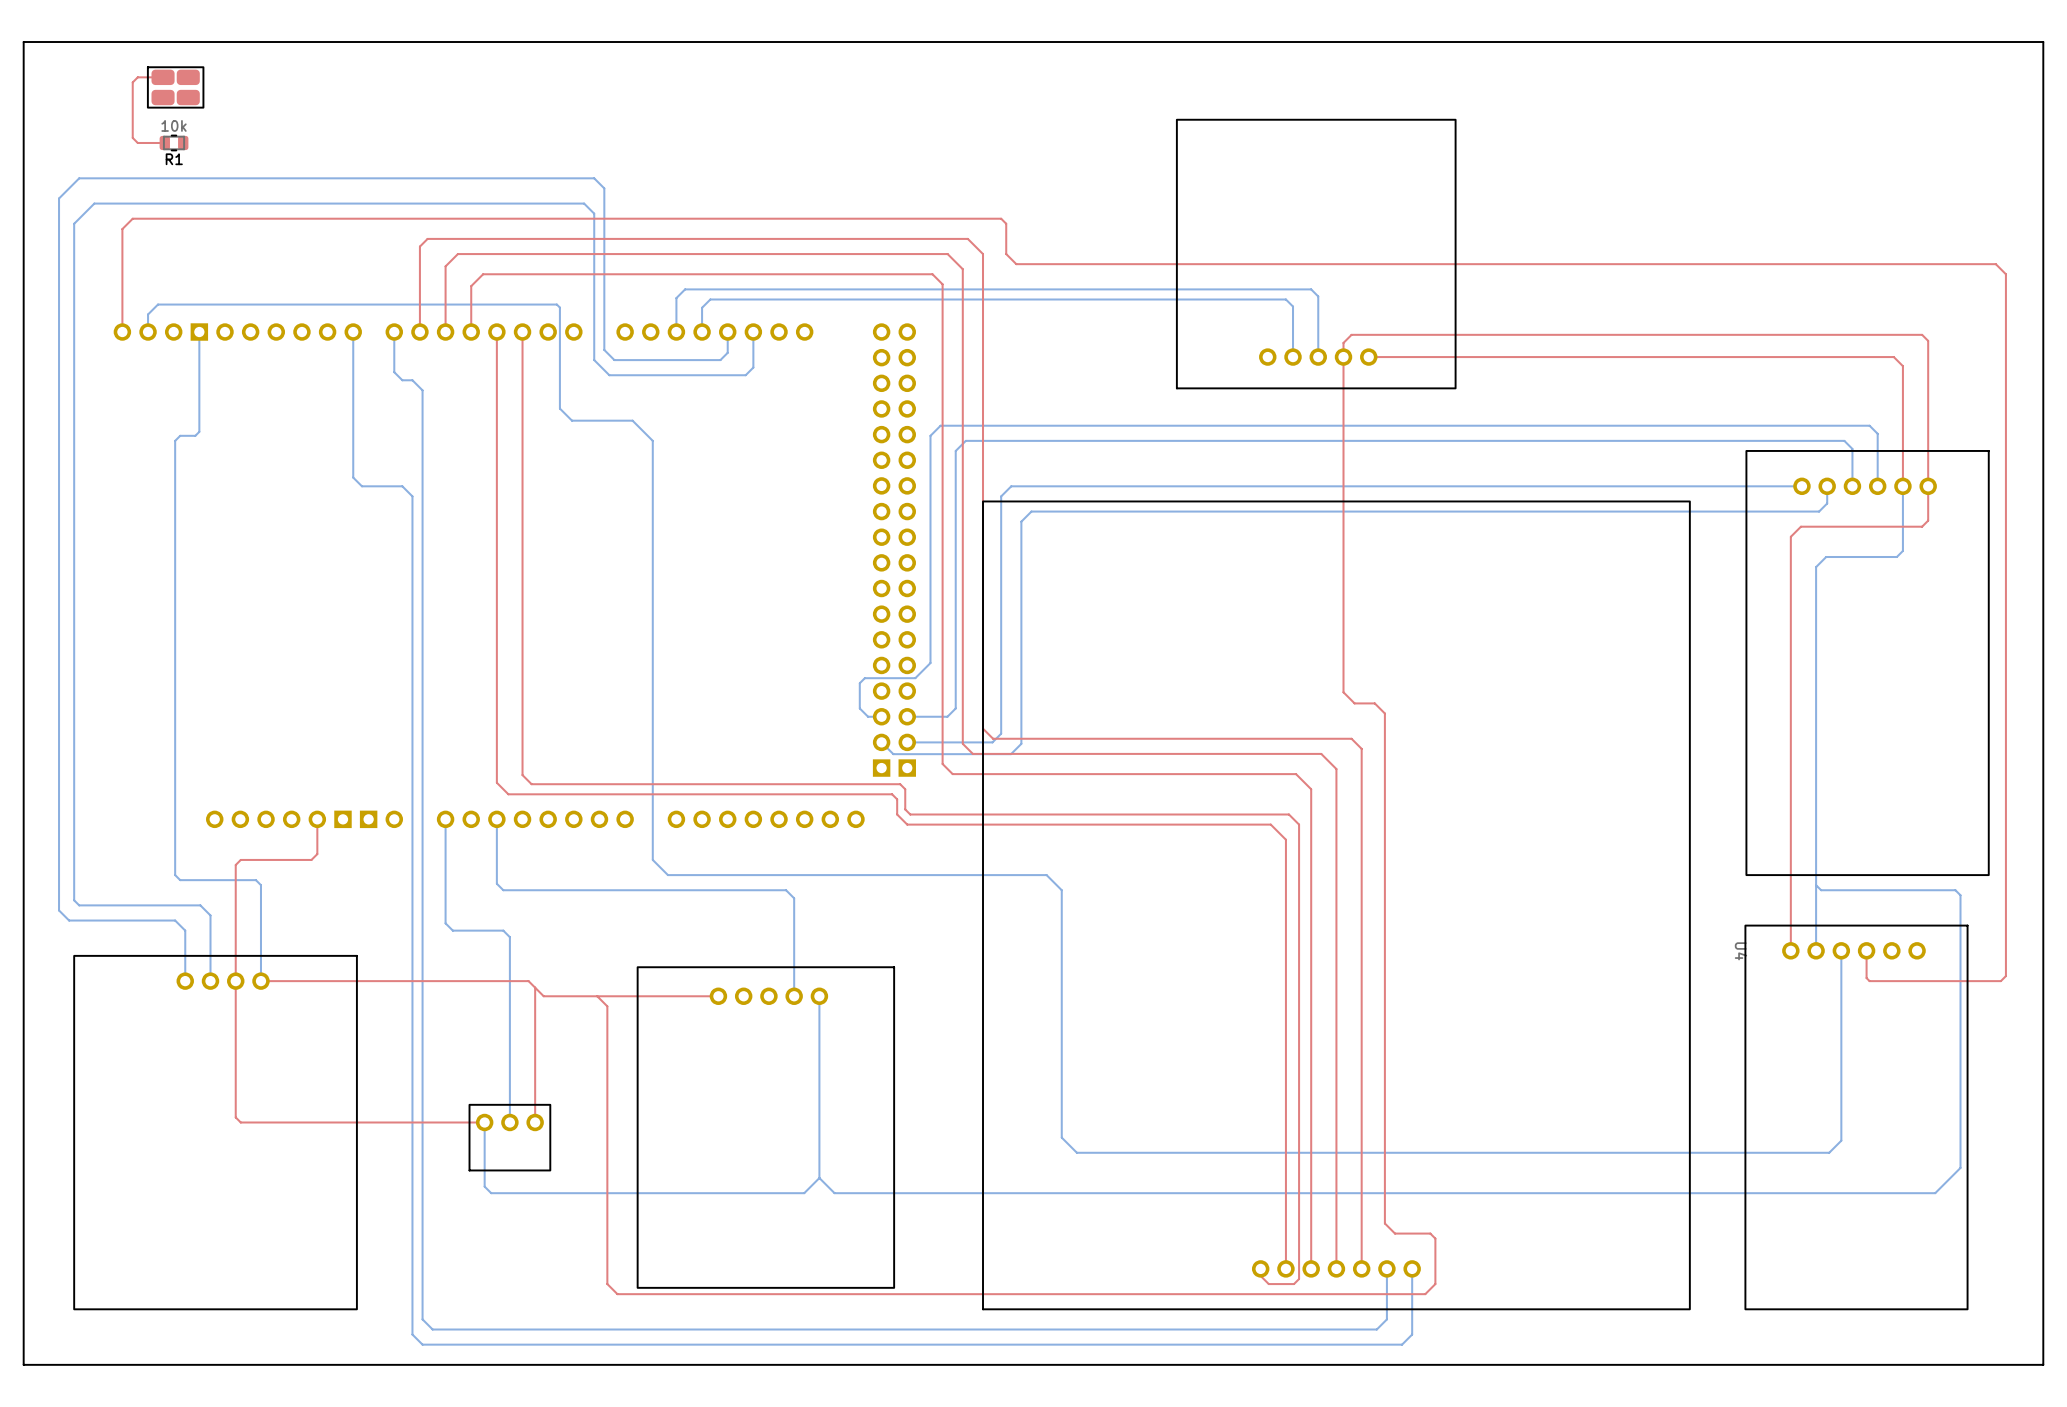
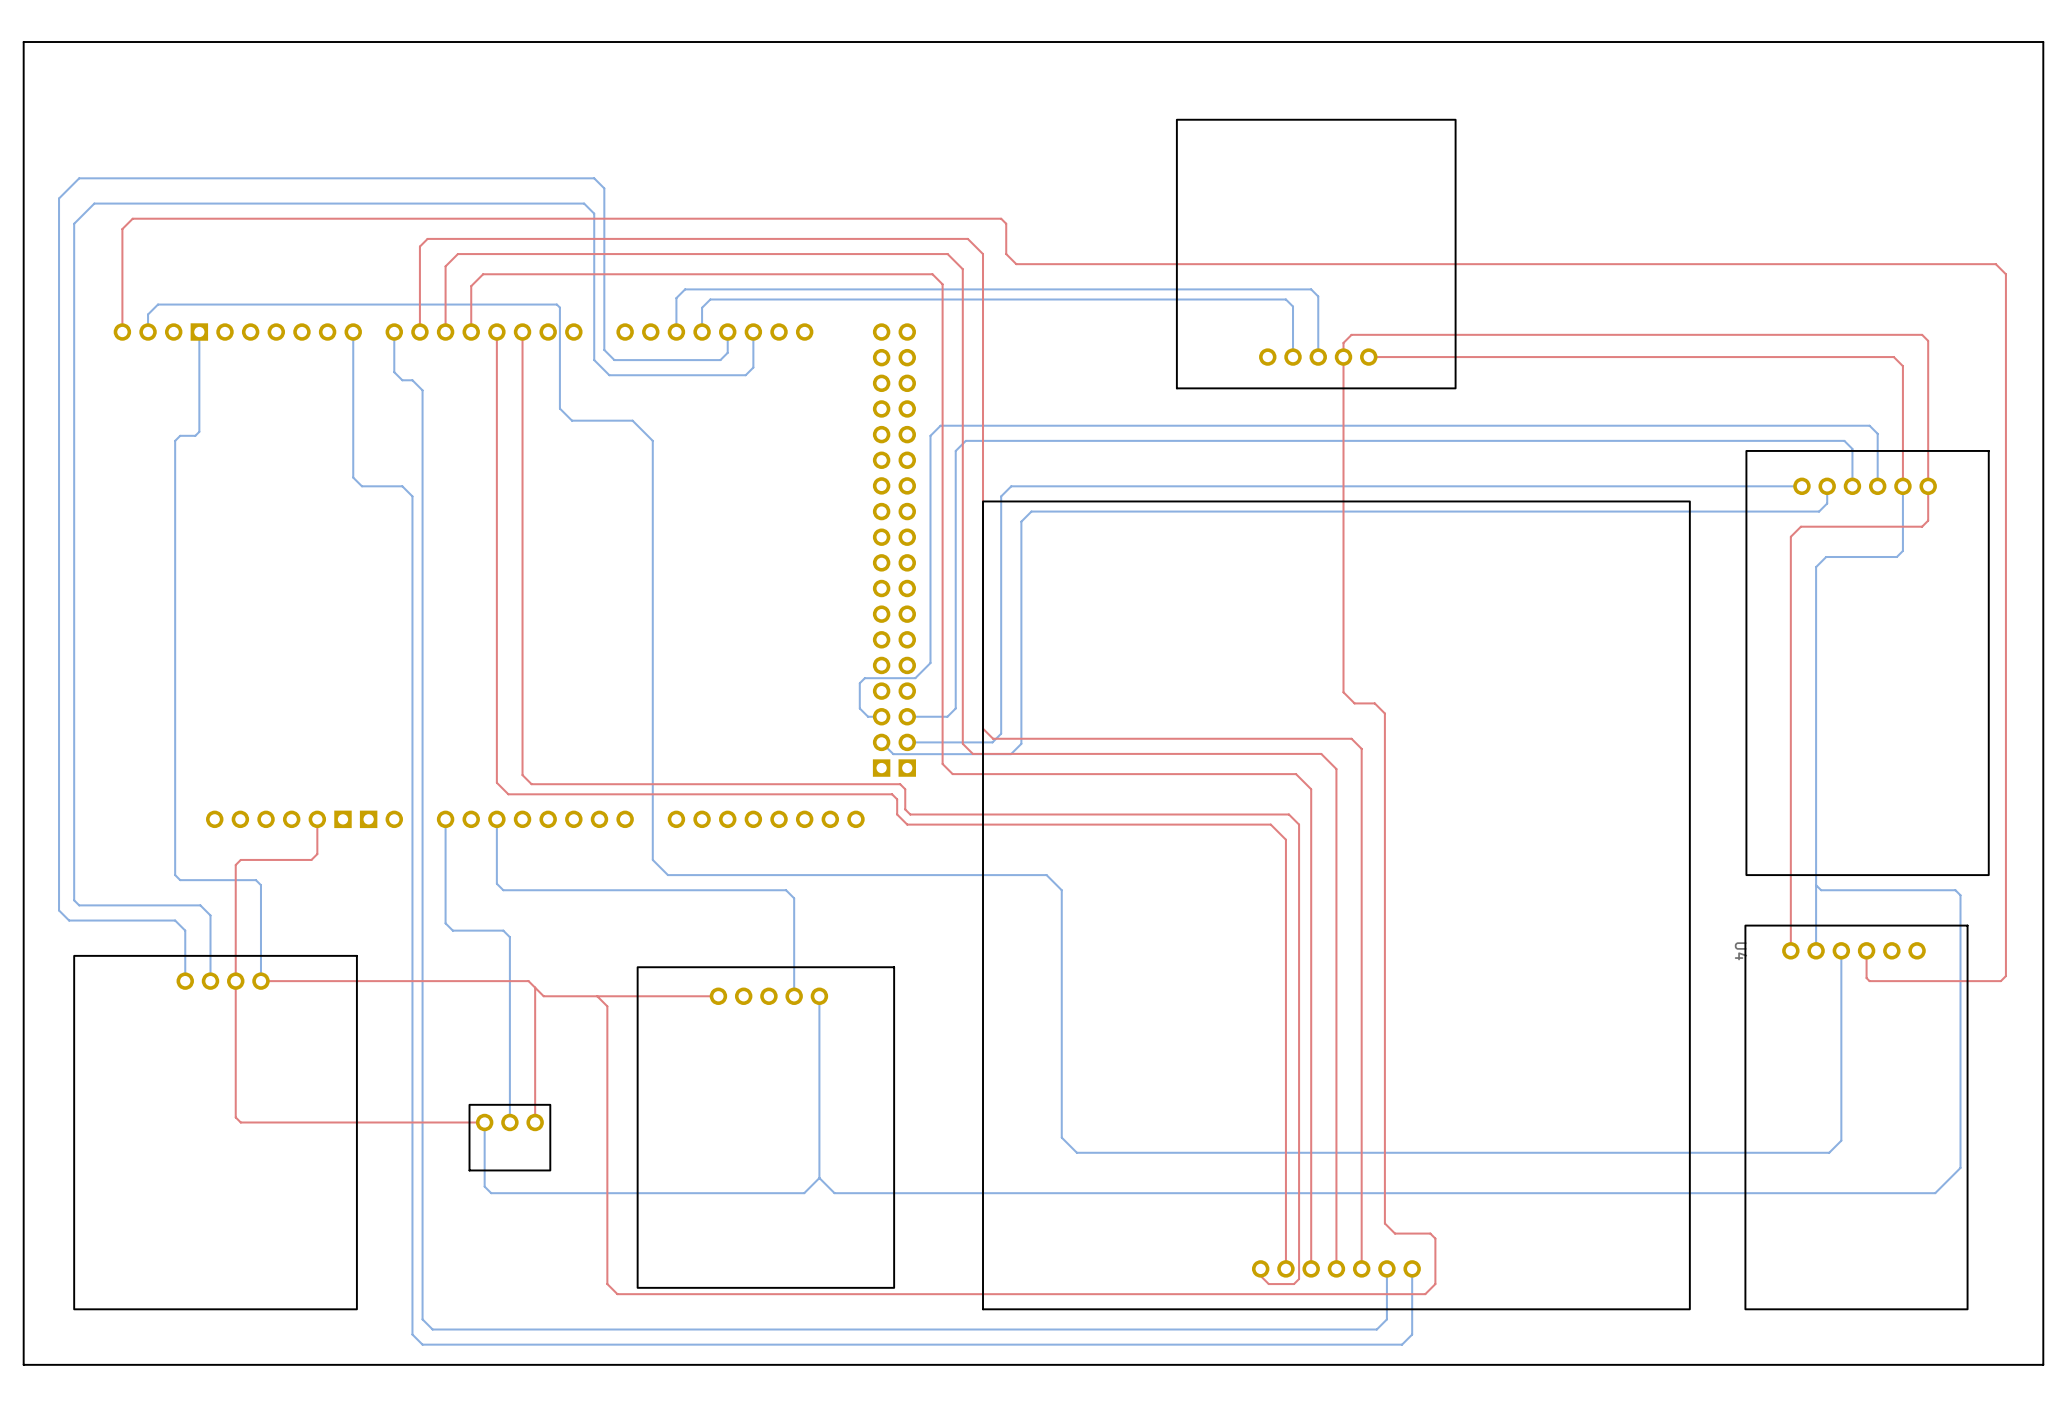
top track: (163, 77) (137, 77) (132, 82) (132, 137) (137, 142) (164, 142) -> none
part: (175, 87) -> none
R1: 10k (174, 142) -> none

